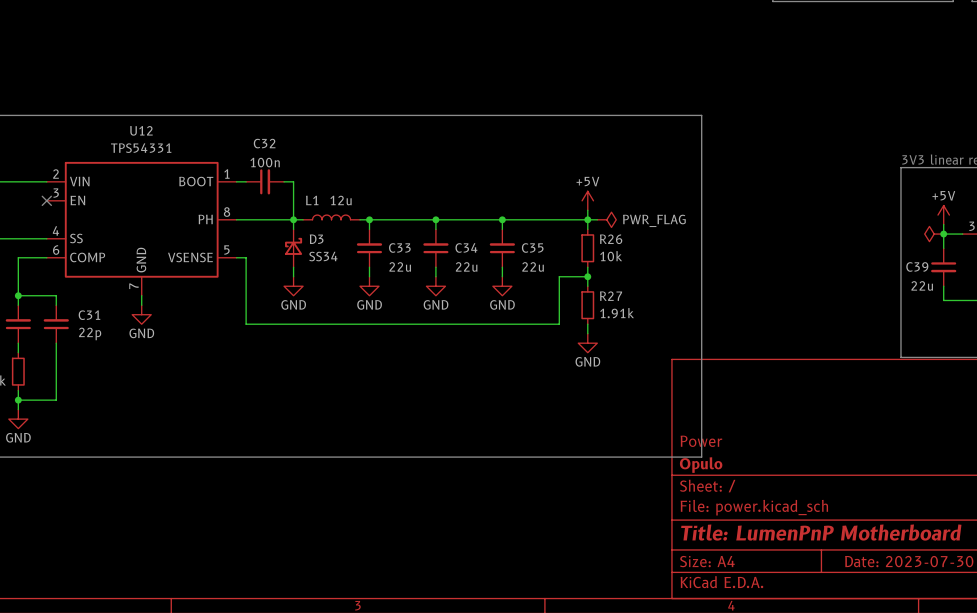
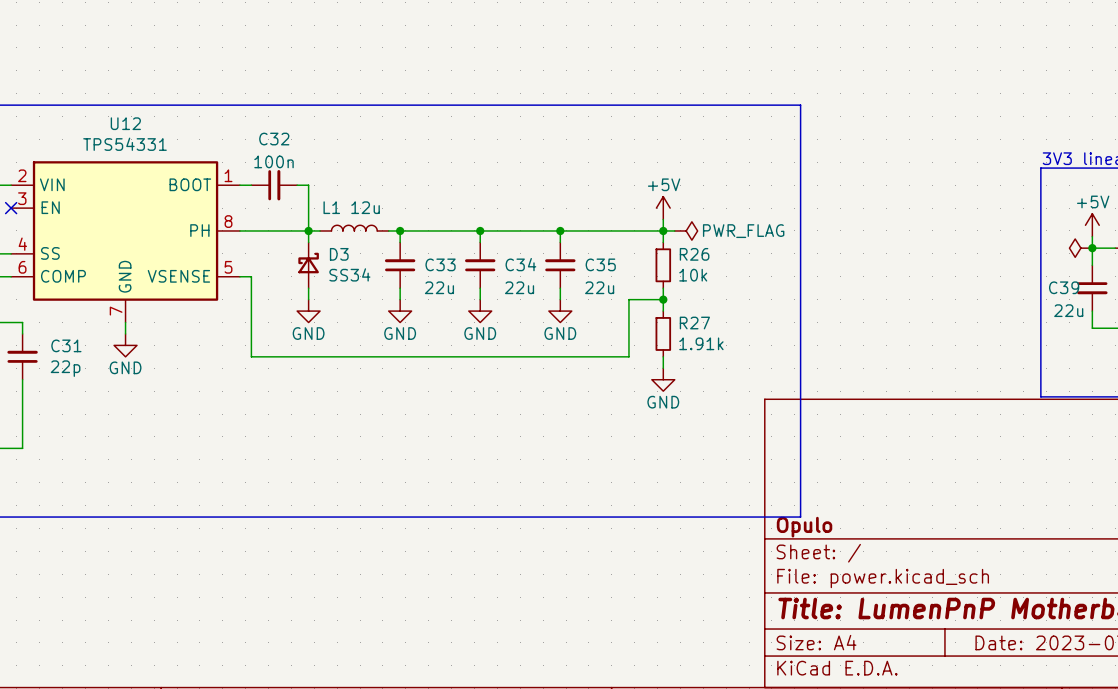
title block: Power (701, 441) -> none

